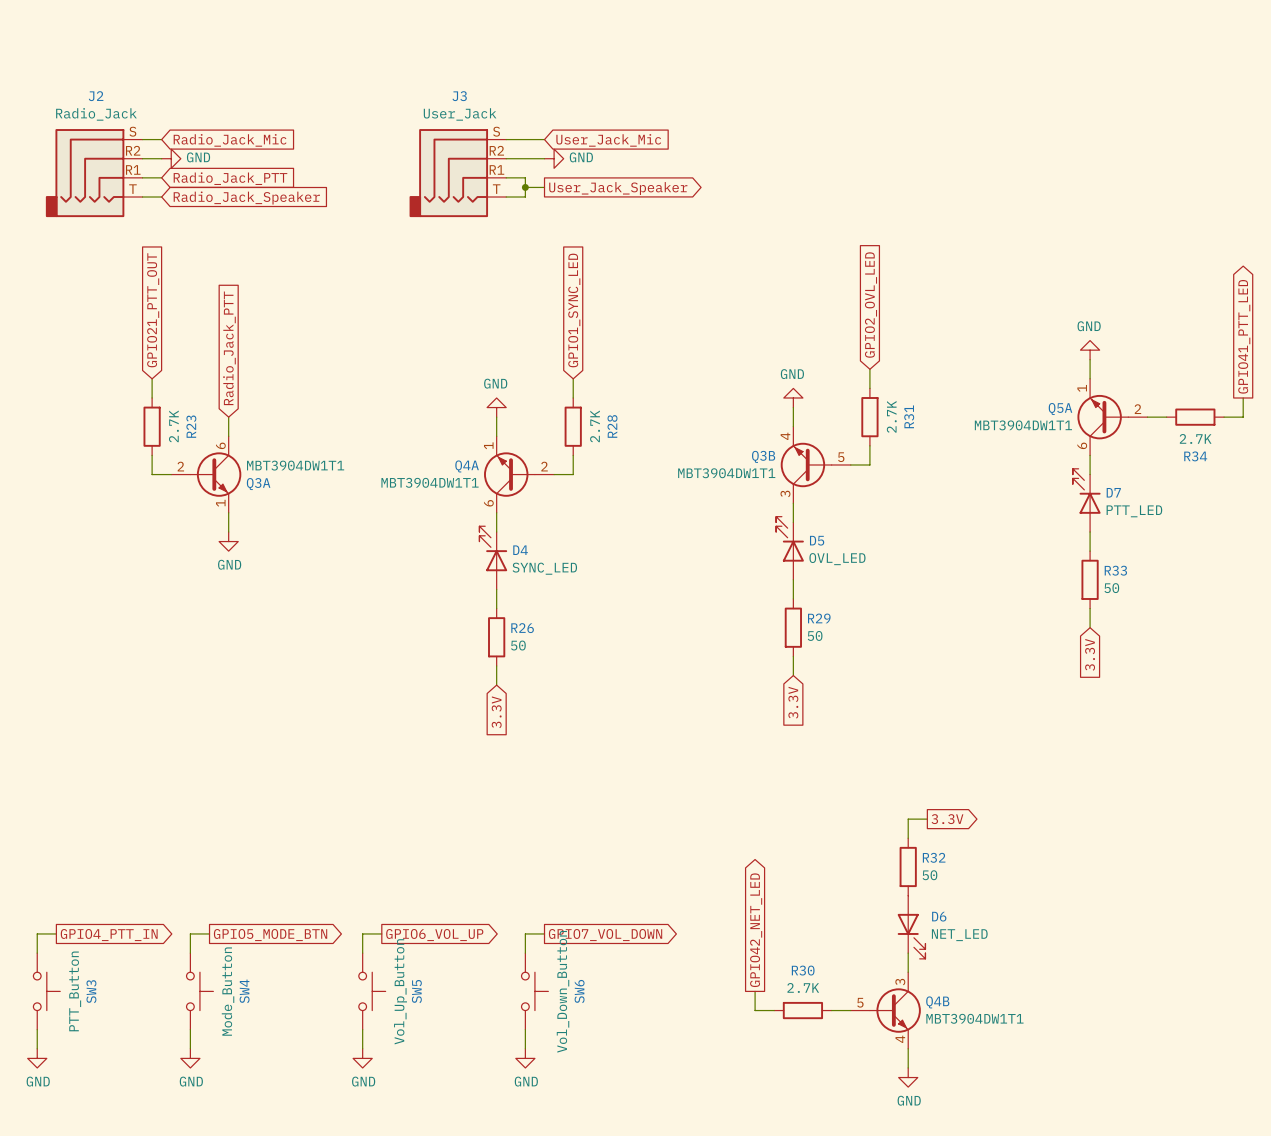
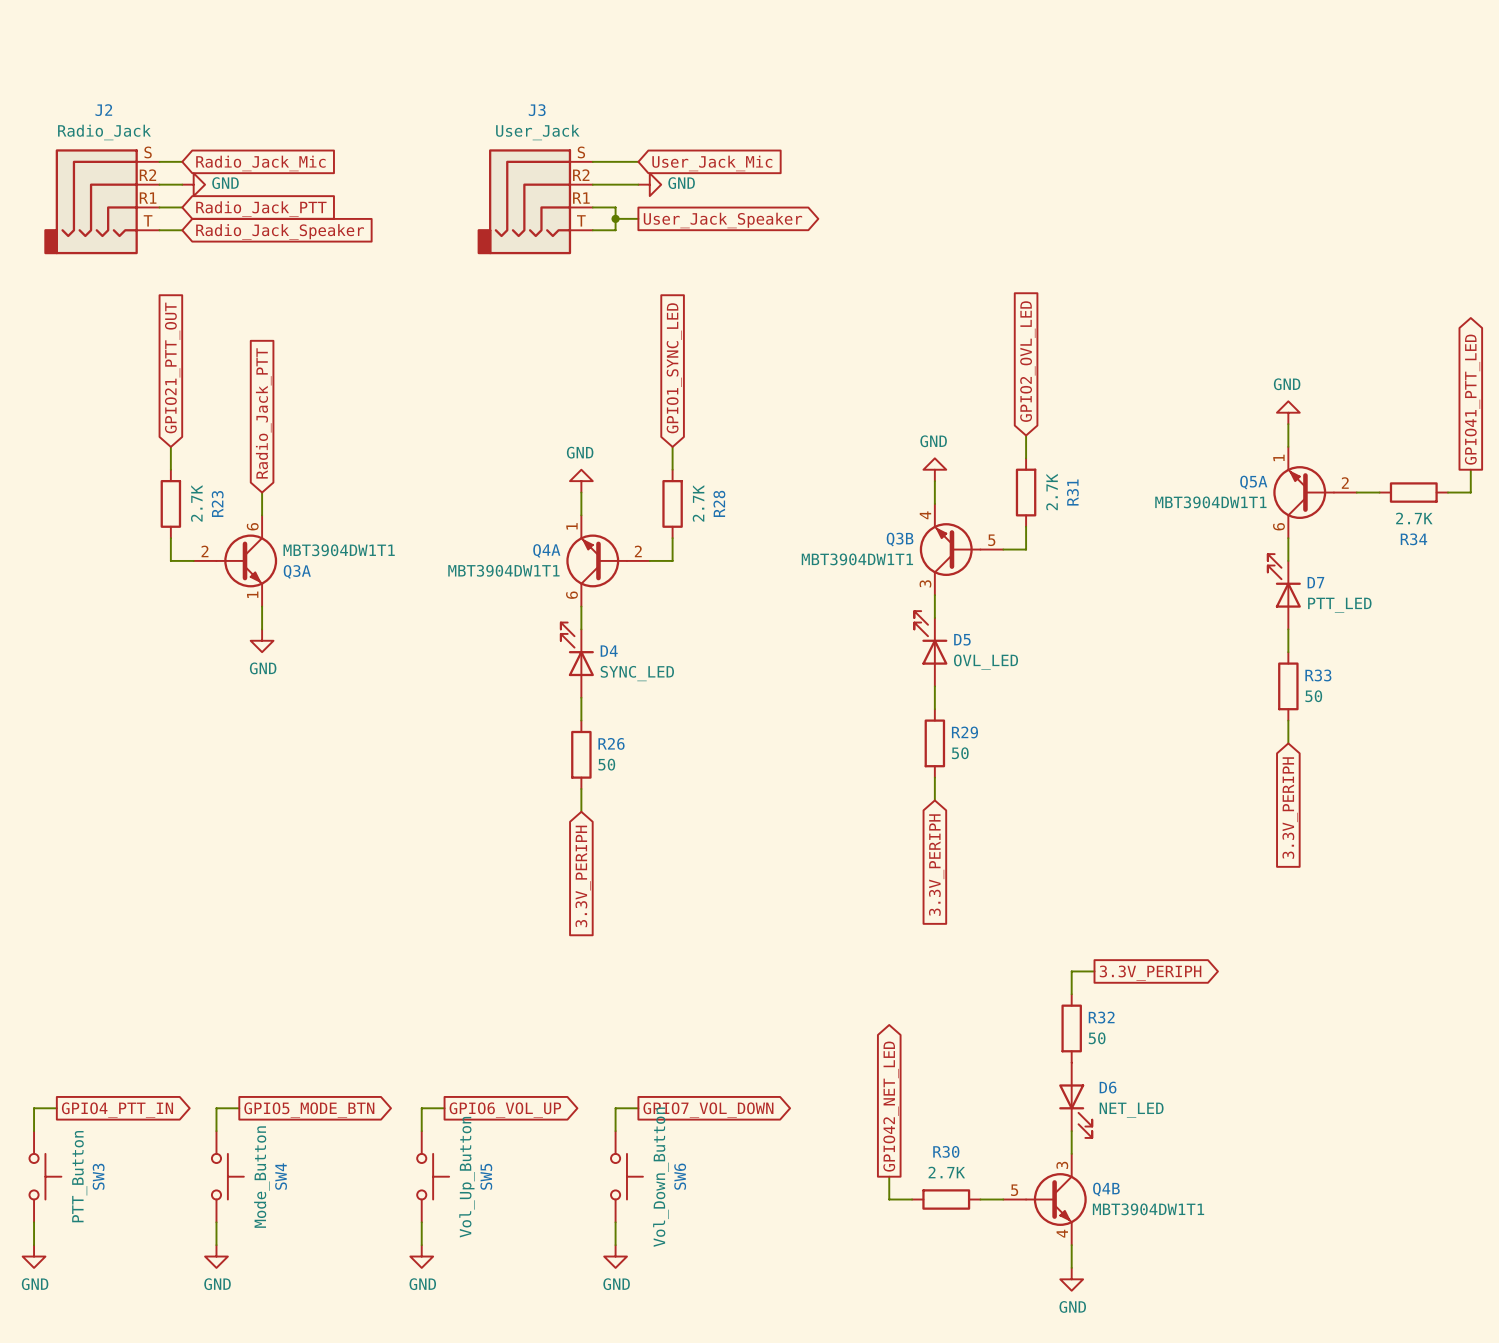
global label: 3.3V (1090, 654) -> 3.3V_PERIPH (1290, 808)
global label: 3.3V (793, 702) -> 3.3V_PERIPH (936, 865)
global label: 3.3V (496, 712) -> 3.3V_PERIPH (583, 876)
global label: 3.3V (947, 819) -> 3.3V_PERIPH (1150, 973)

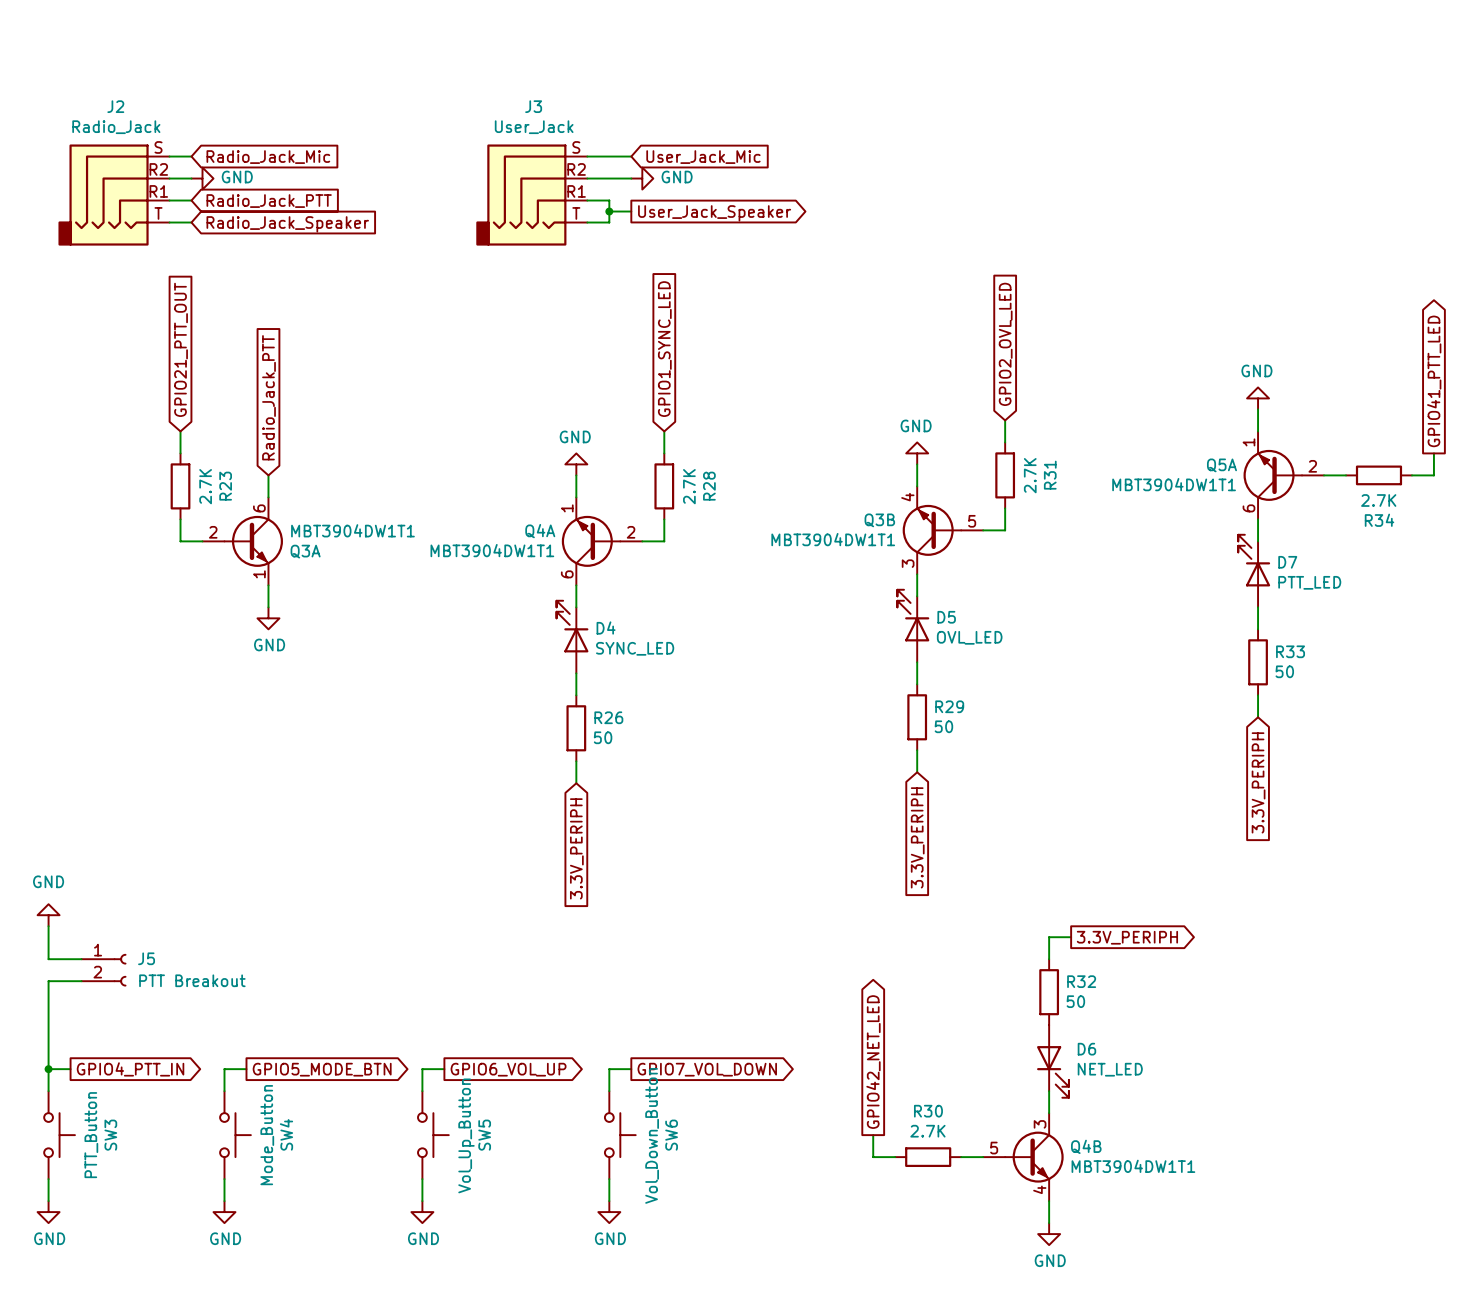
power symbol: none -> GND (48, 915)
wire: none -> (48, 926) (48, 959) (81, 959)
J5: none -> PTT Breakout (103, 970)
wire: none -> (81, 981) (48, 981) (48, 1069)
junction: none -> (48, 1069)

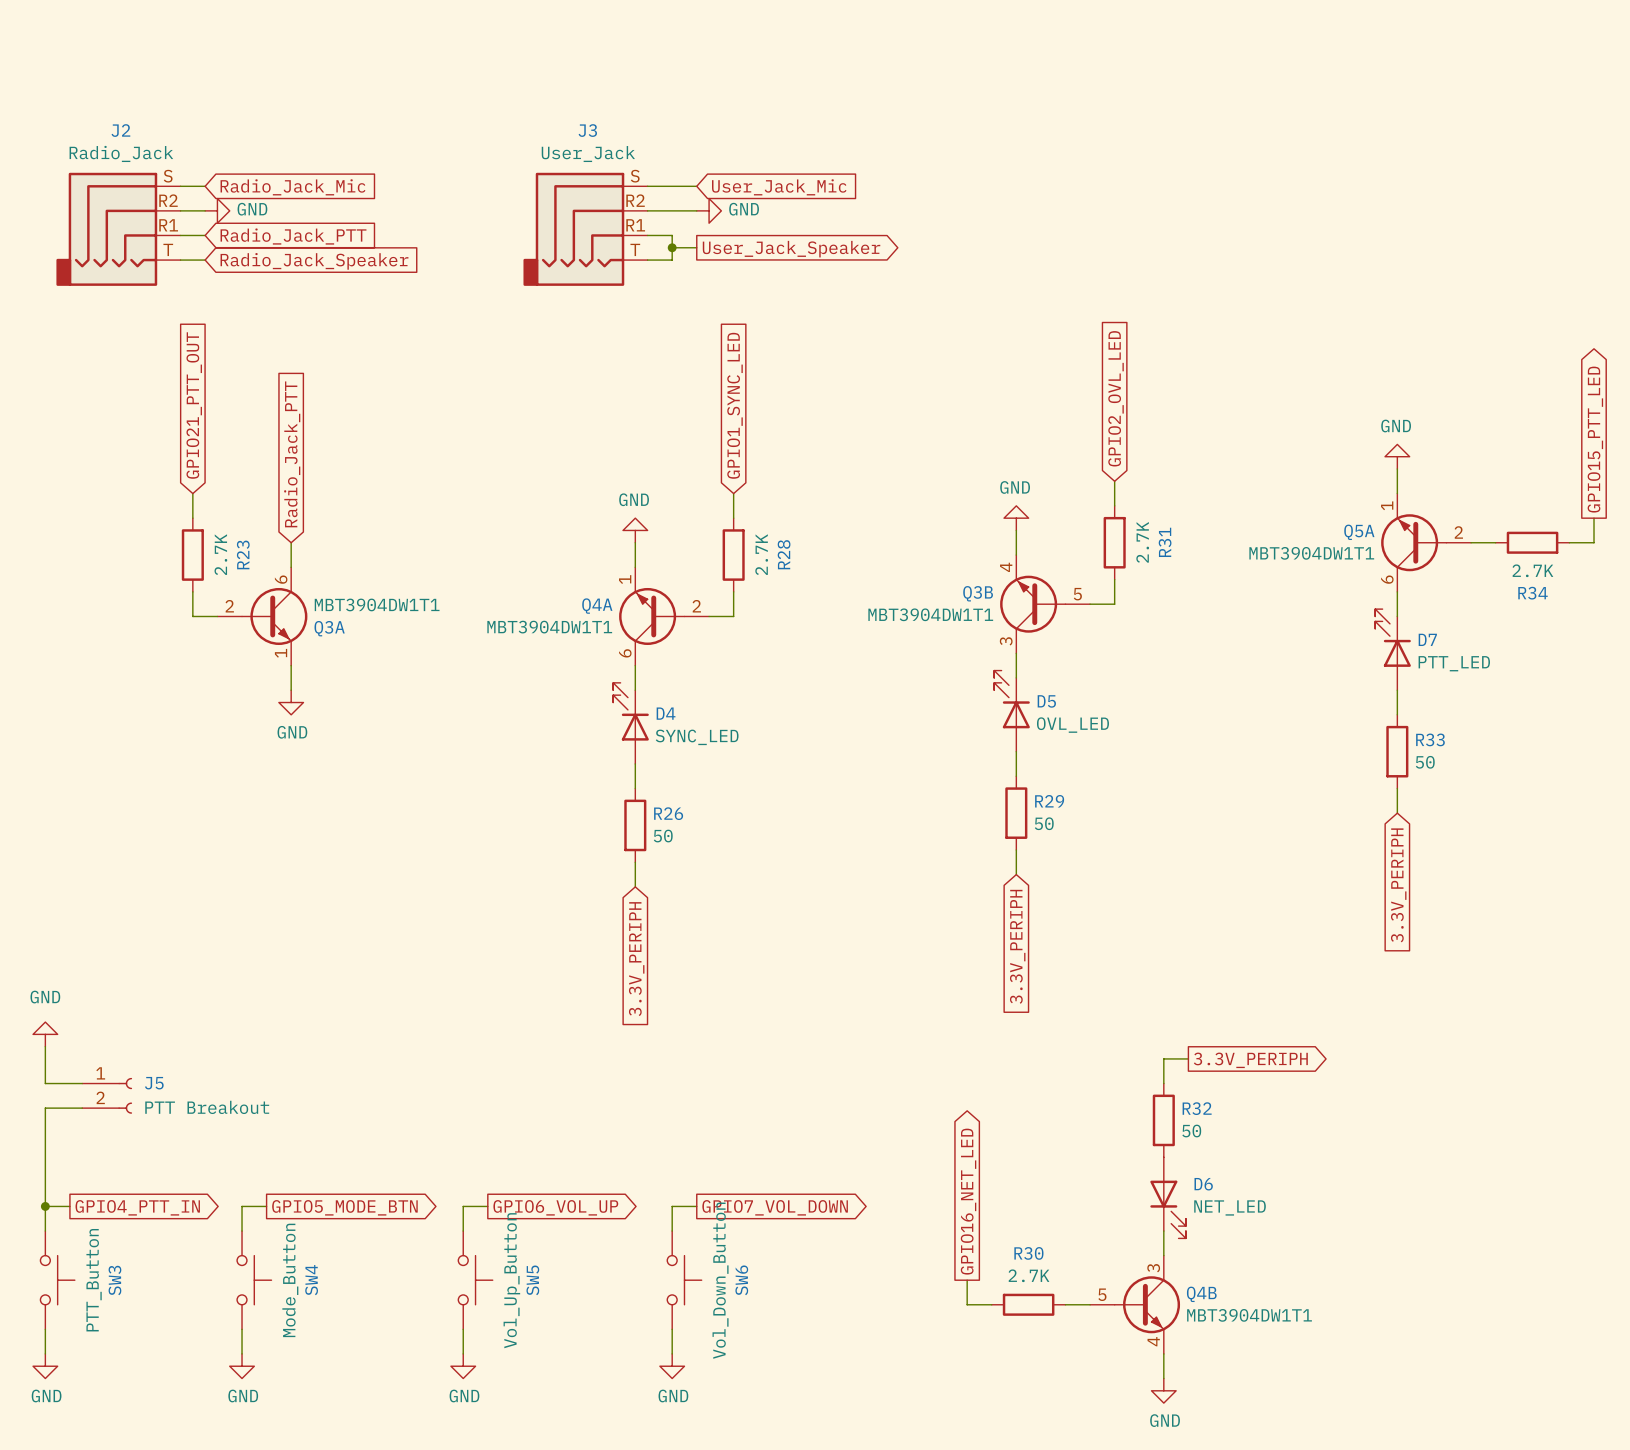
global label: GPIO41_PTT_LED (1434, 381) -> GPIO15_PTT_LED (1595, 439)
global label: GPIO42_NET_LED (873, 1062) -> GPIO16_NET_LED (968, 1201)

